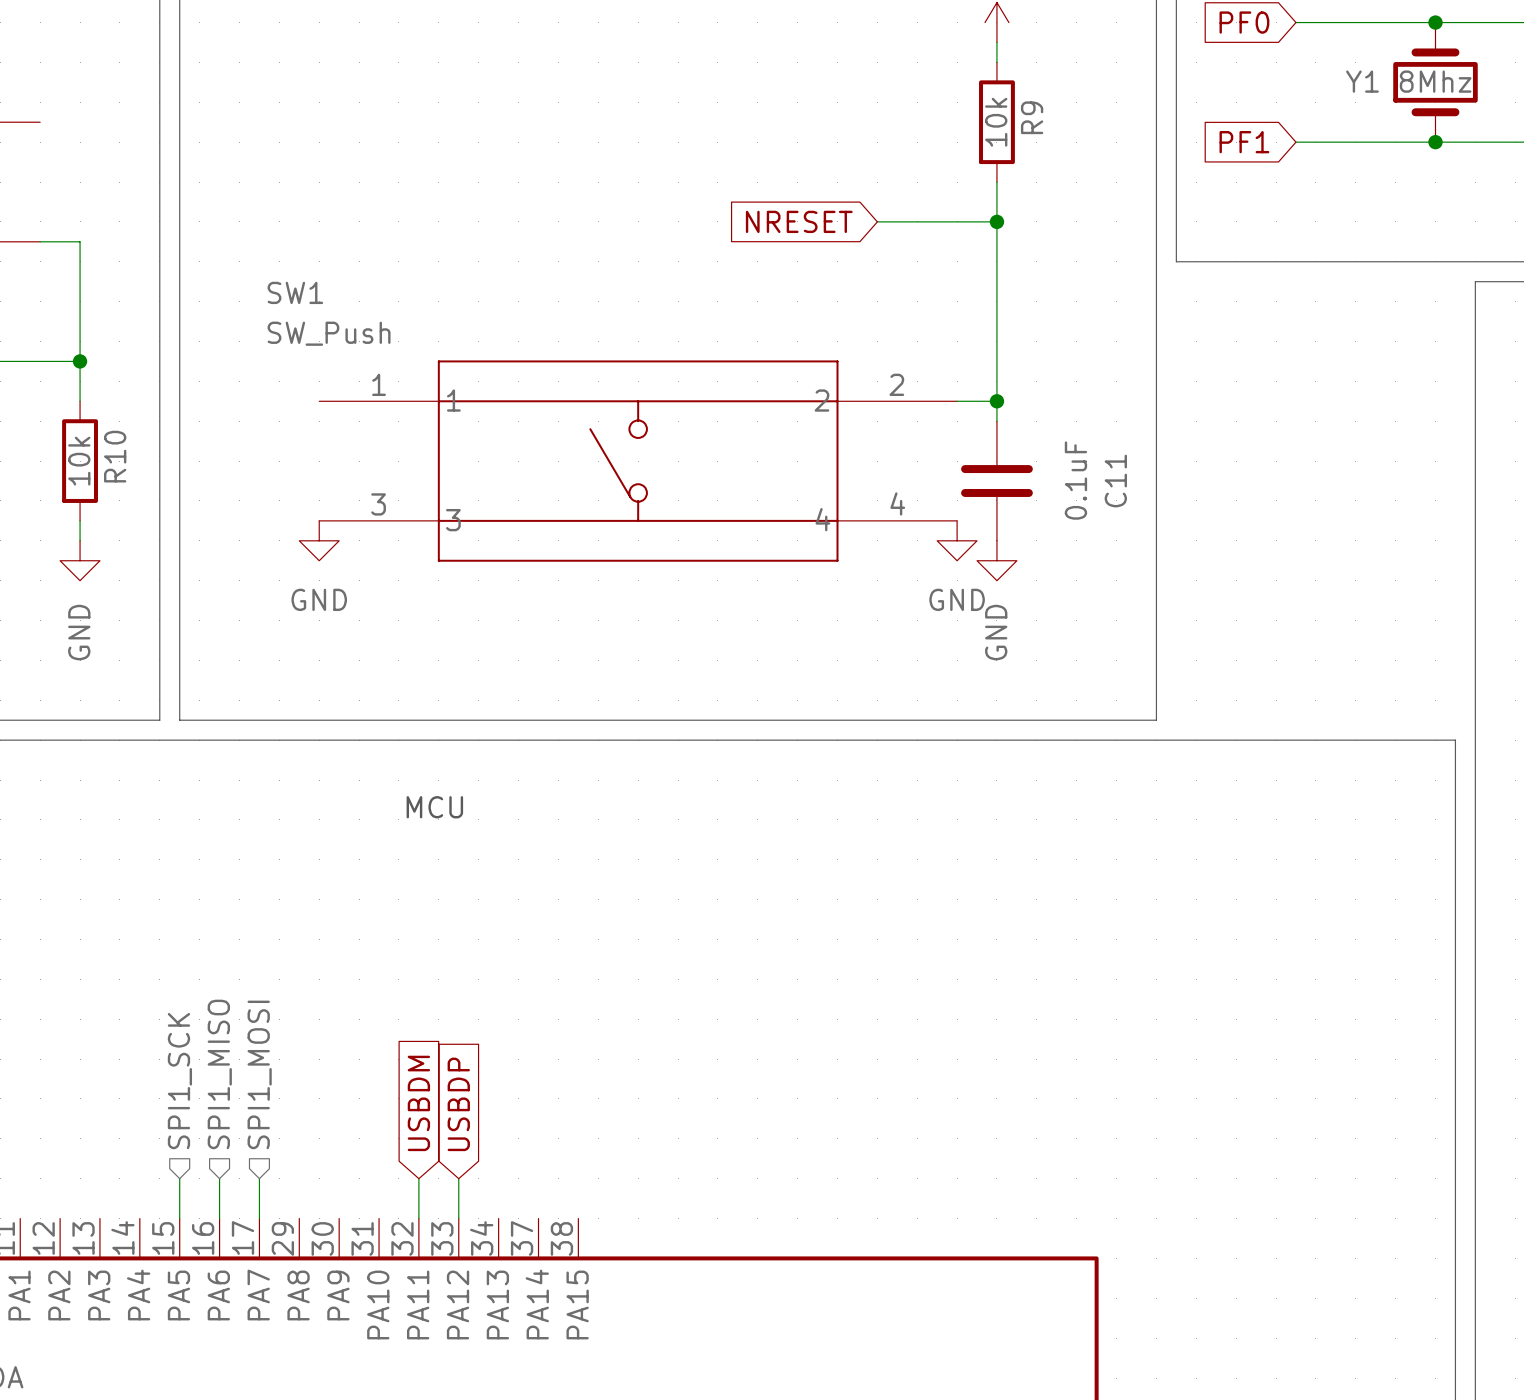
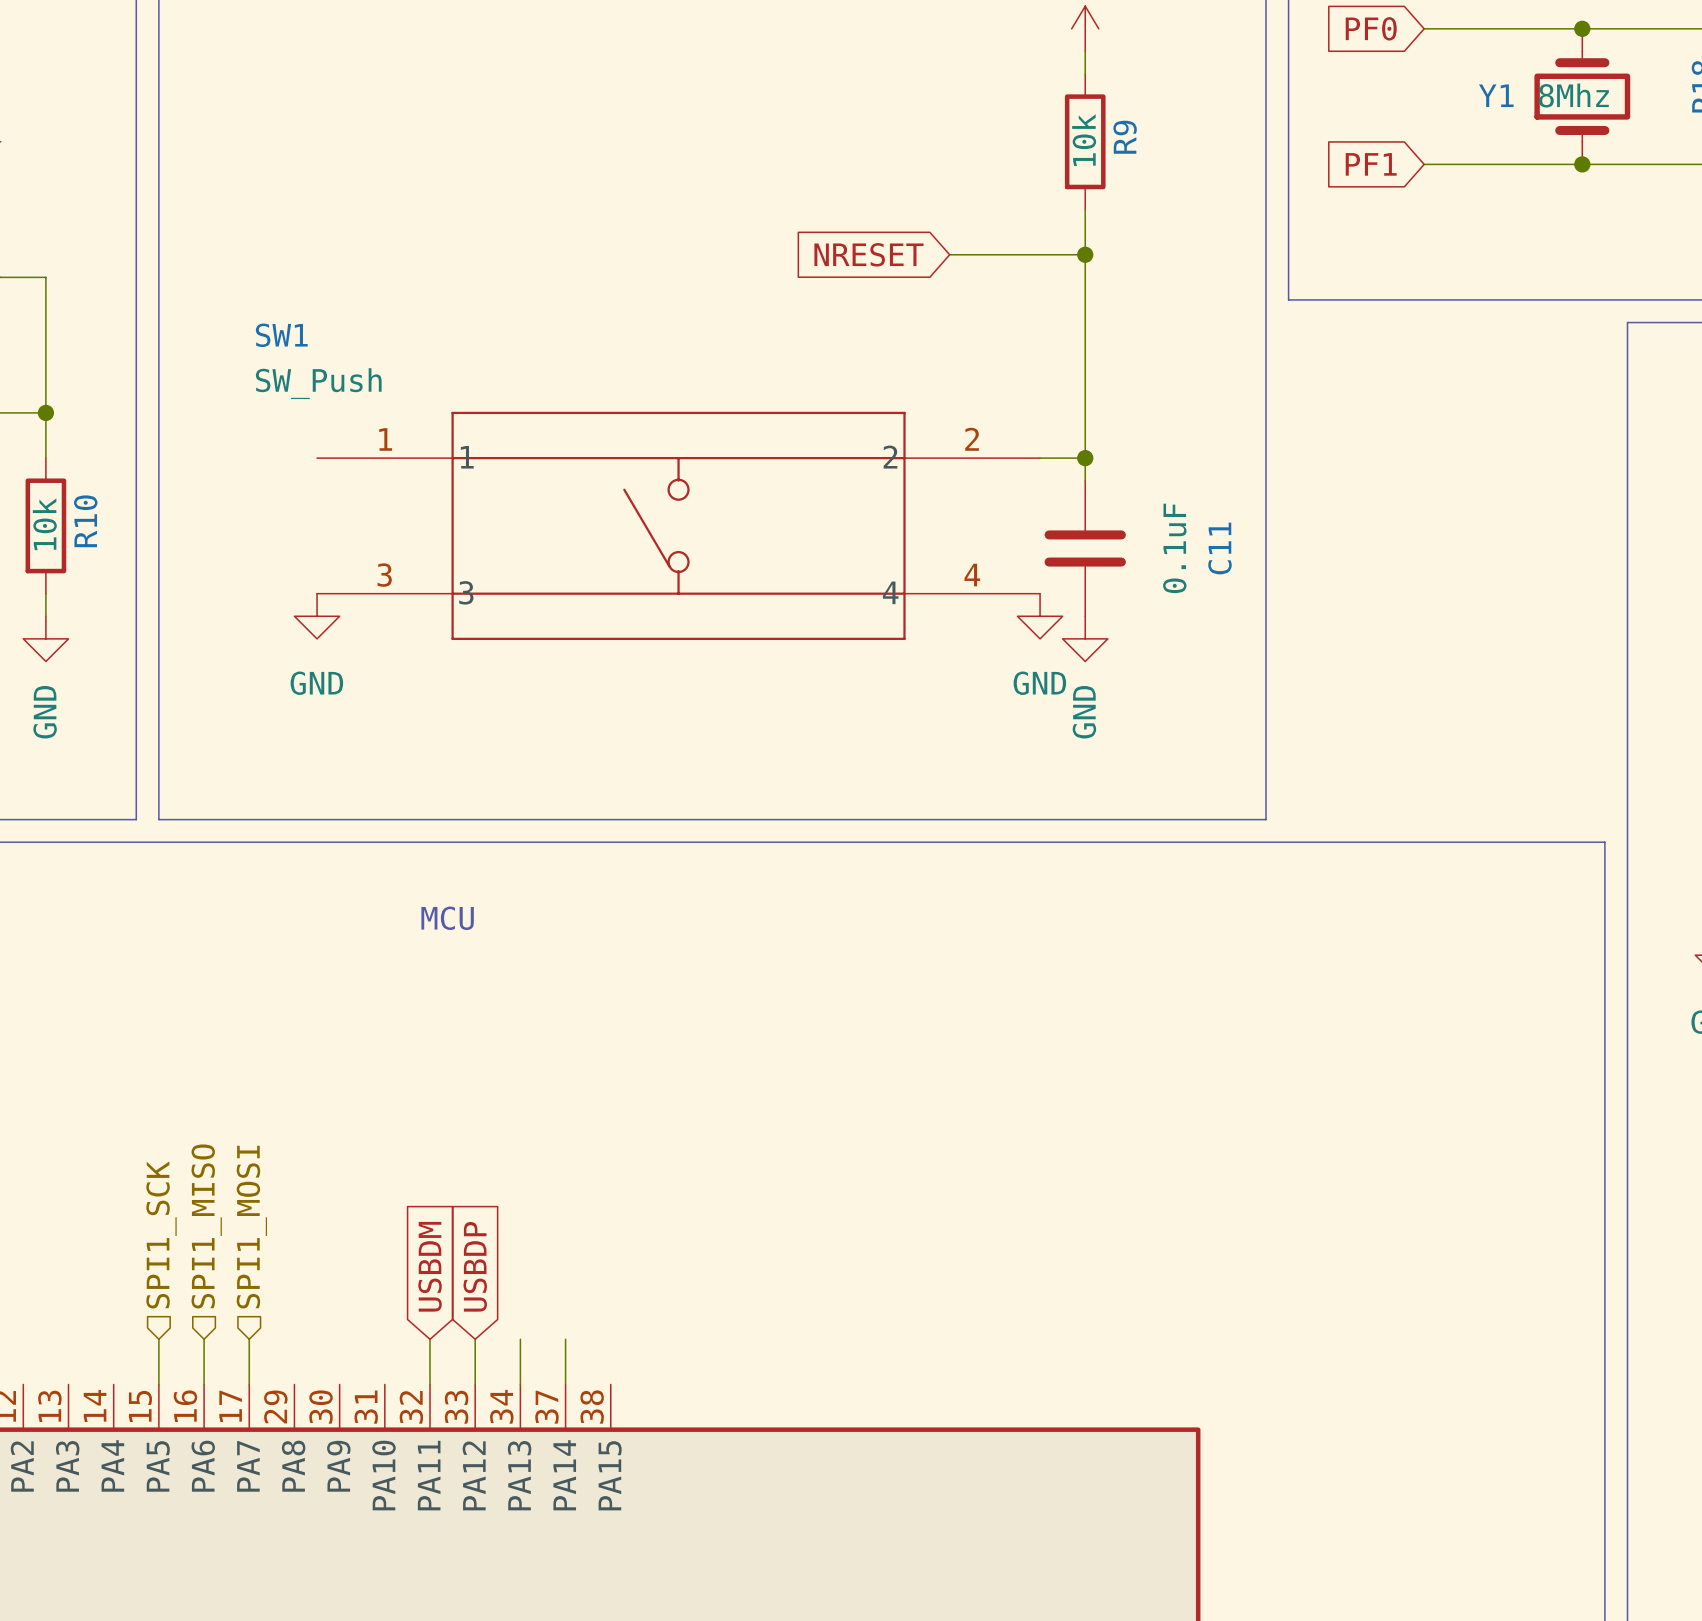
wire: none -> (520, 1339) (520, 1384)
wire: none -> (565, 1339) (565, 1384)

